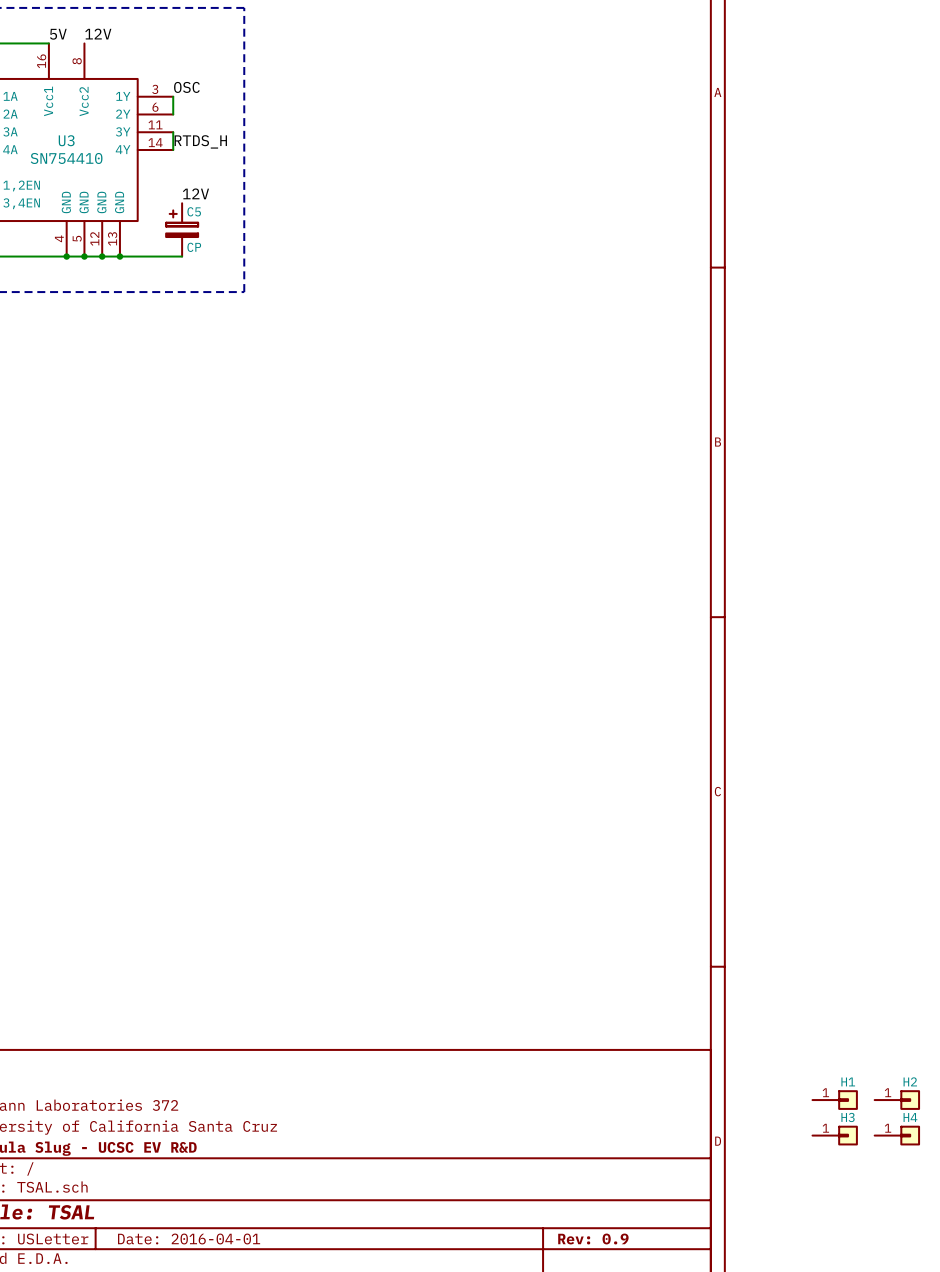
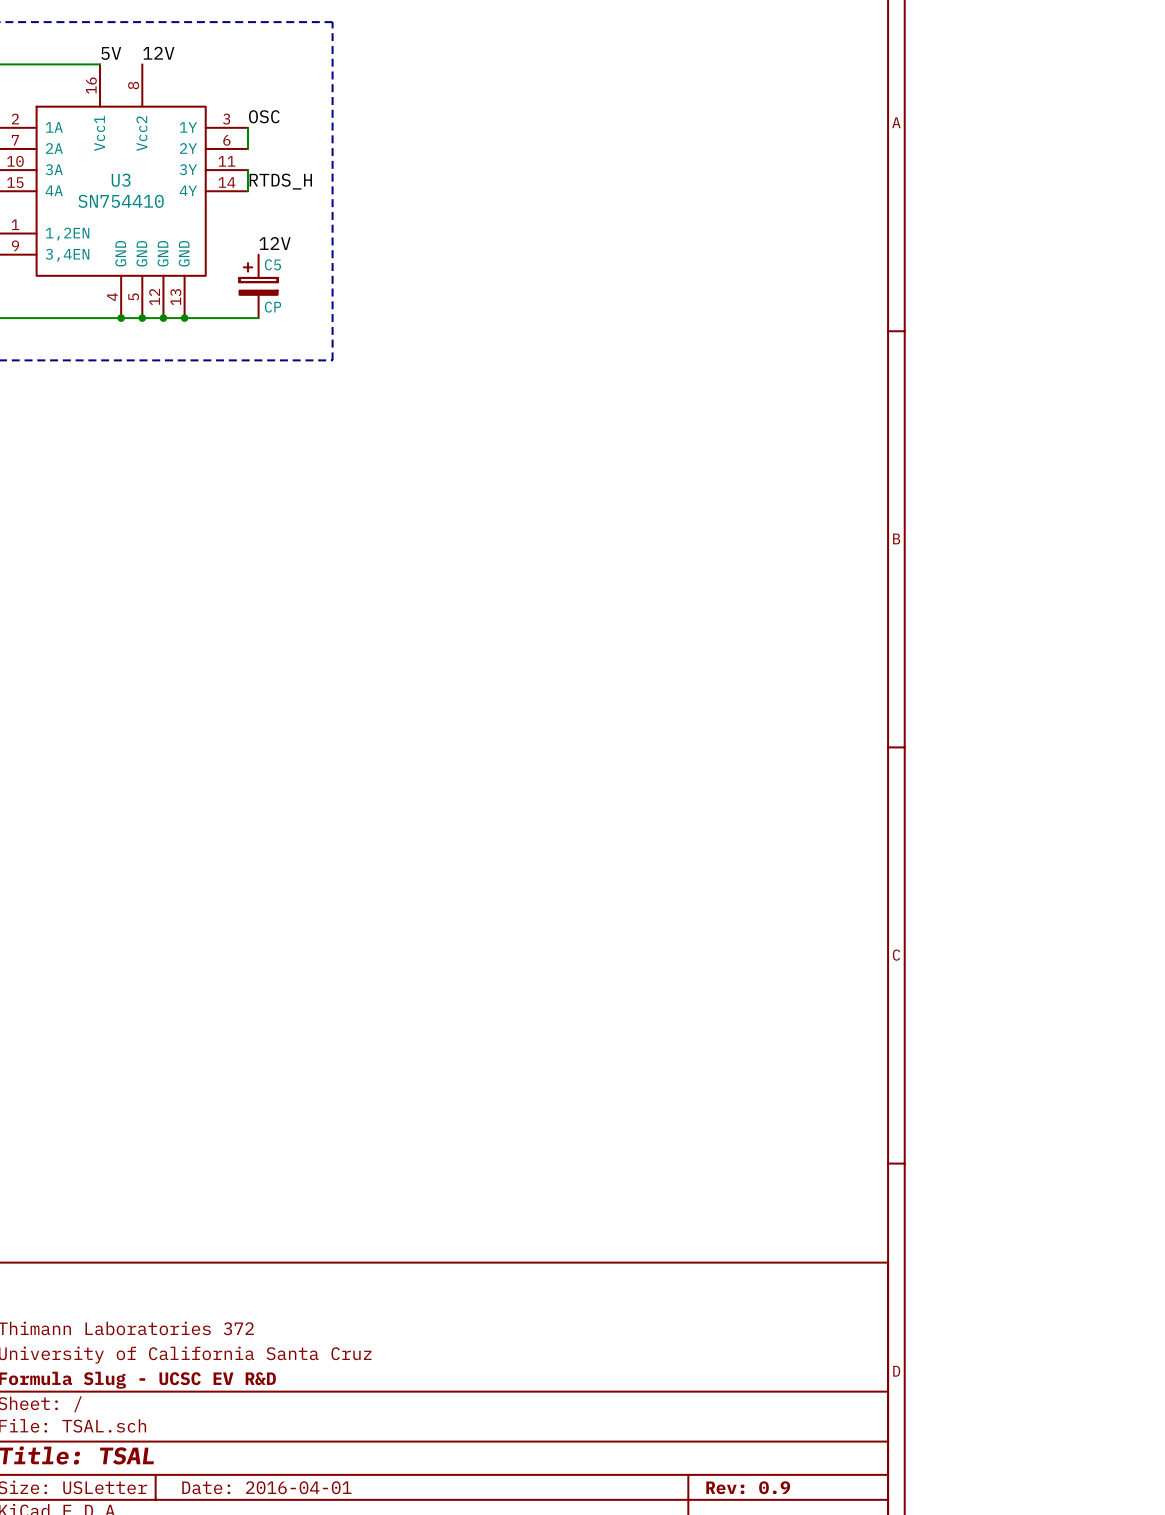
H1: (835, 1100) -> none
H2: (897, 1100) -> none
H3: (835, 1135) -> none
H4: (897, 1135) -> none

